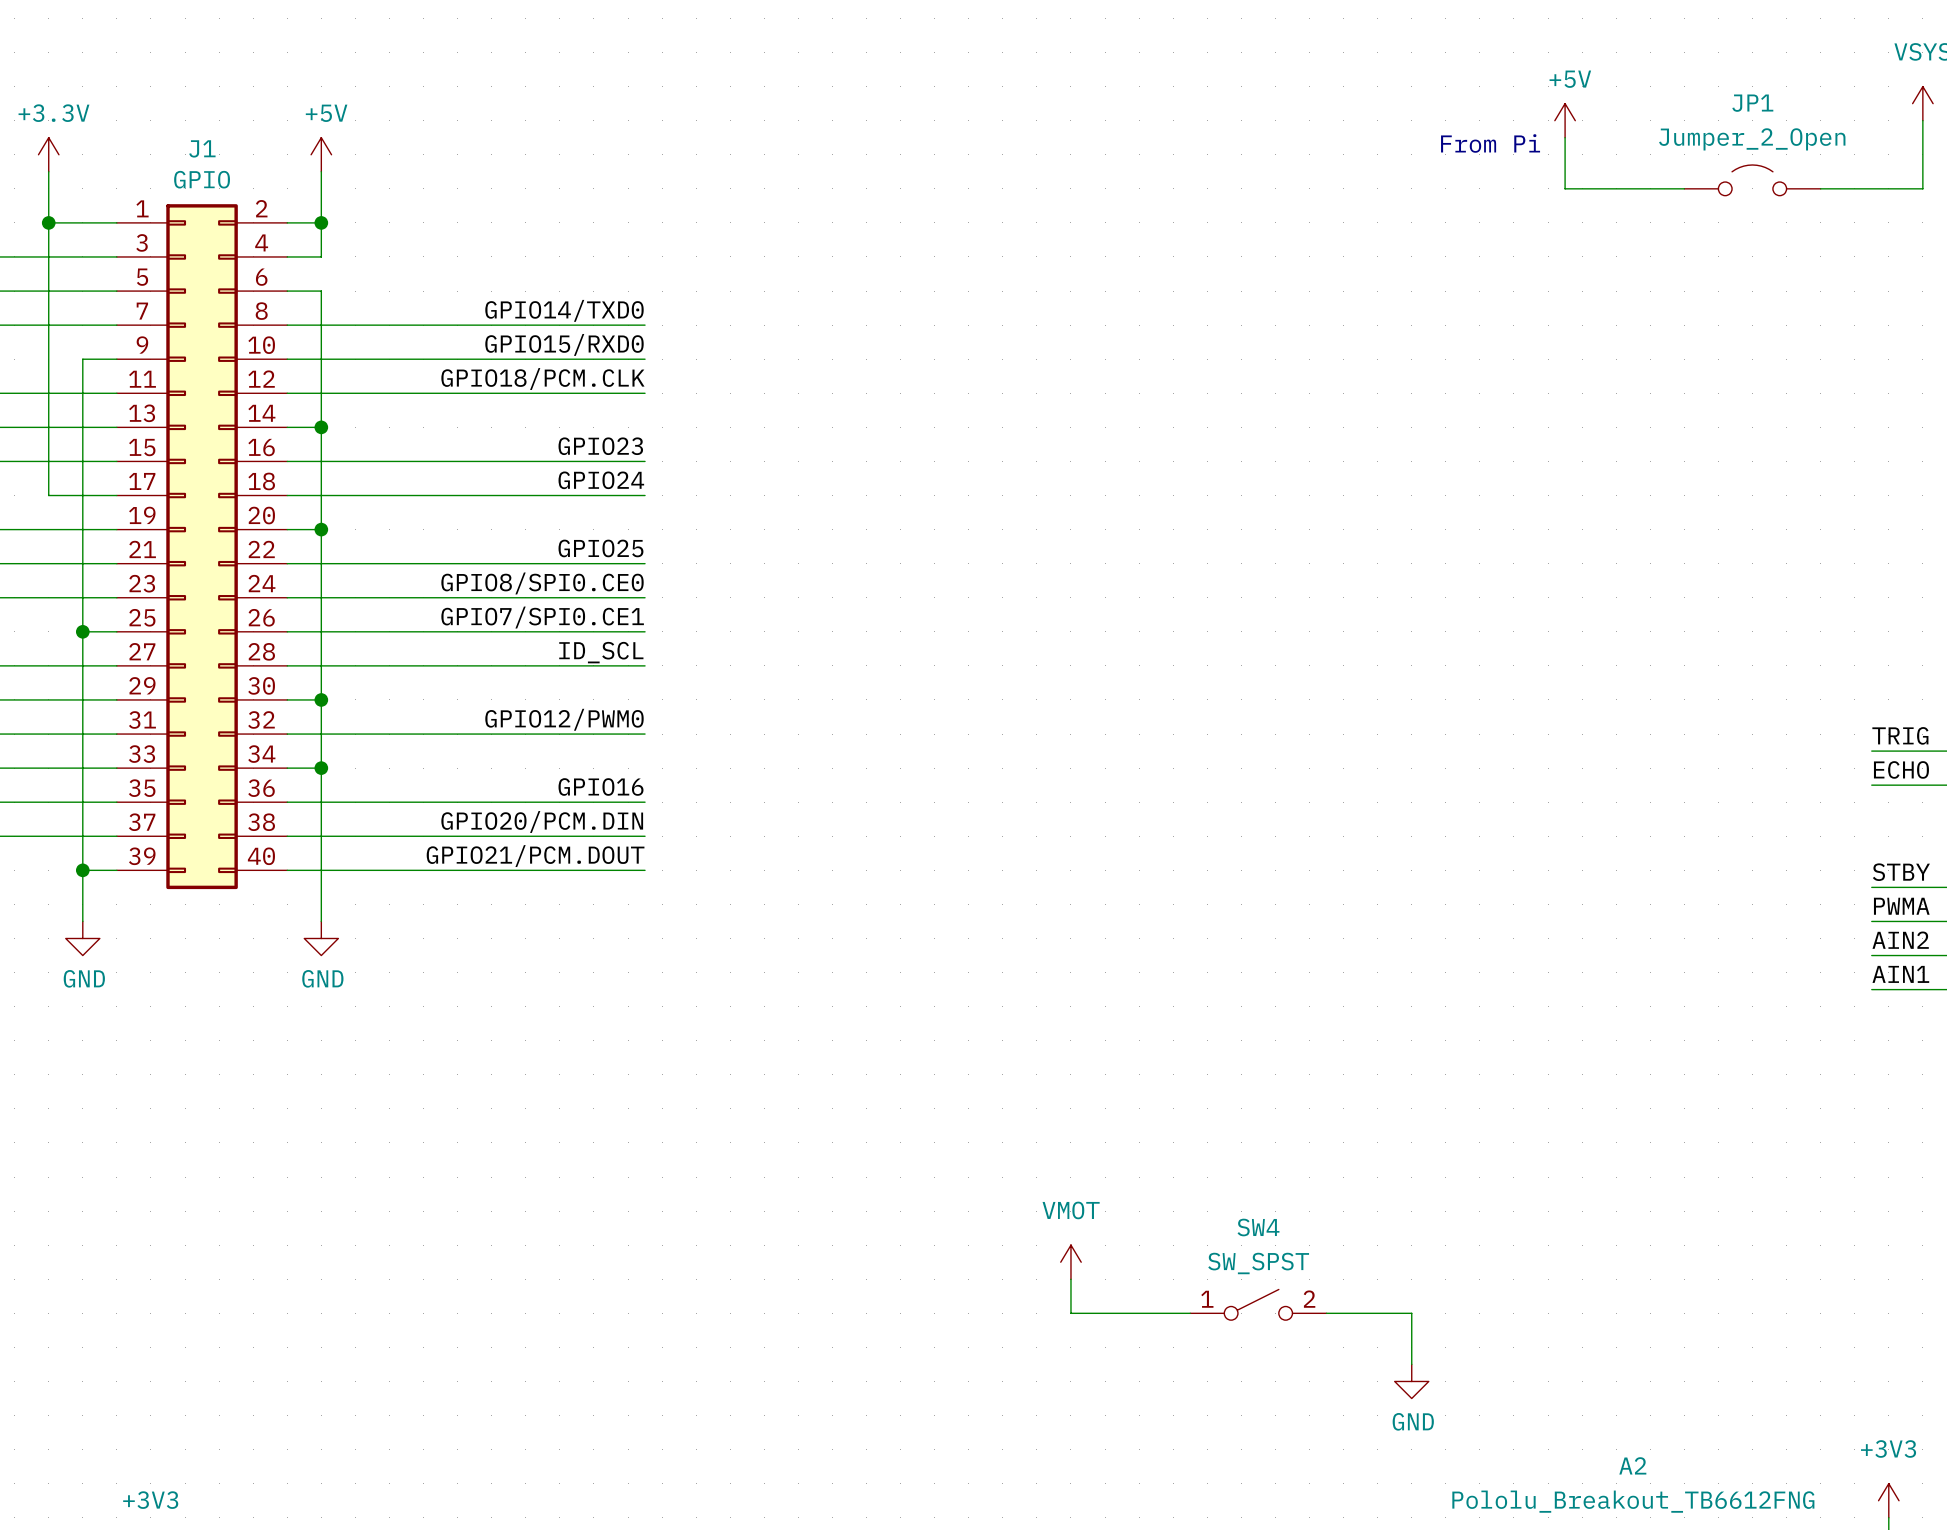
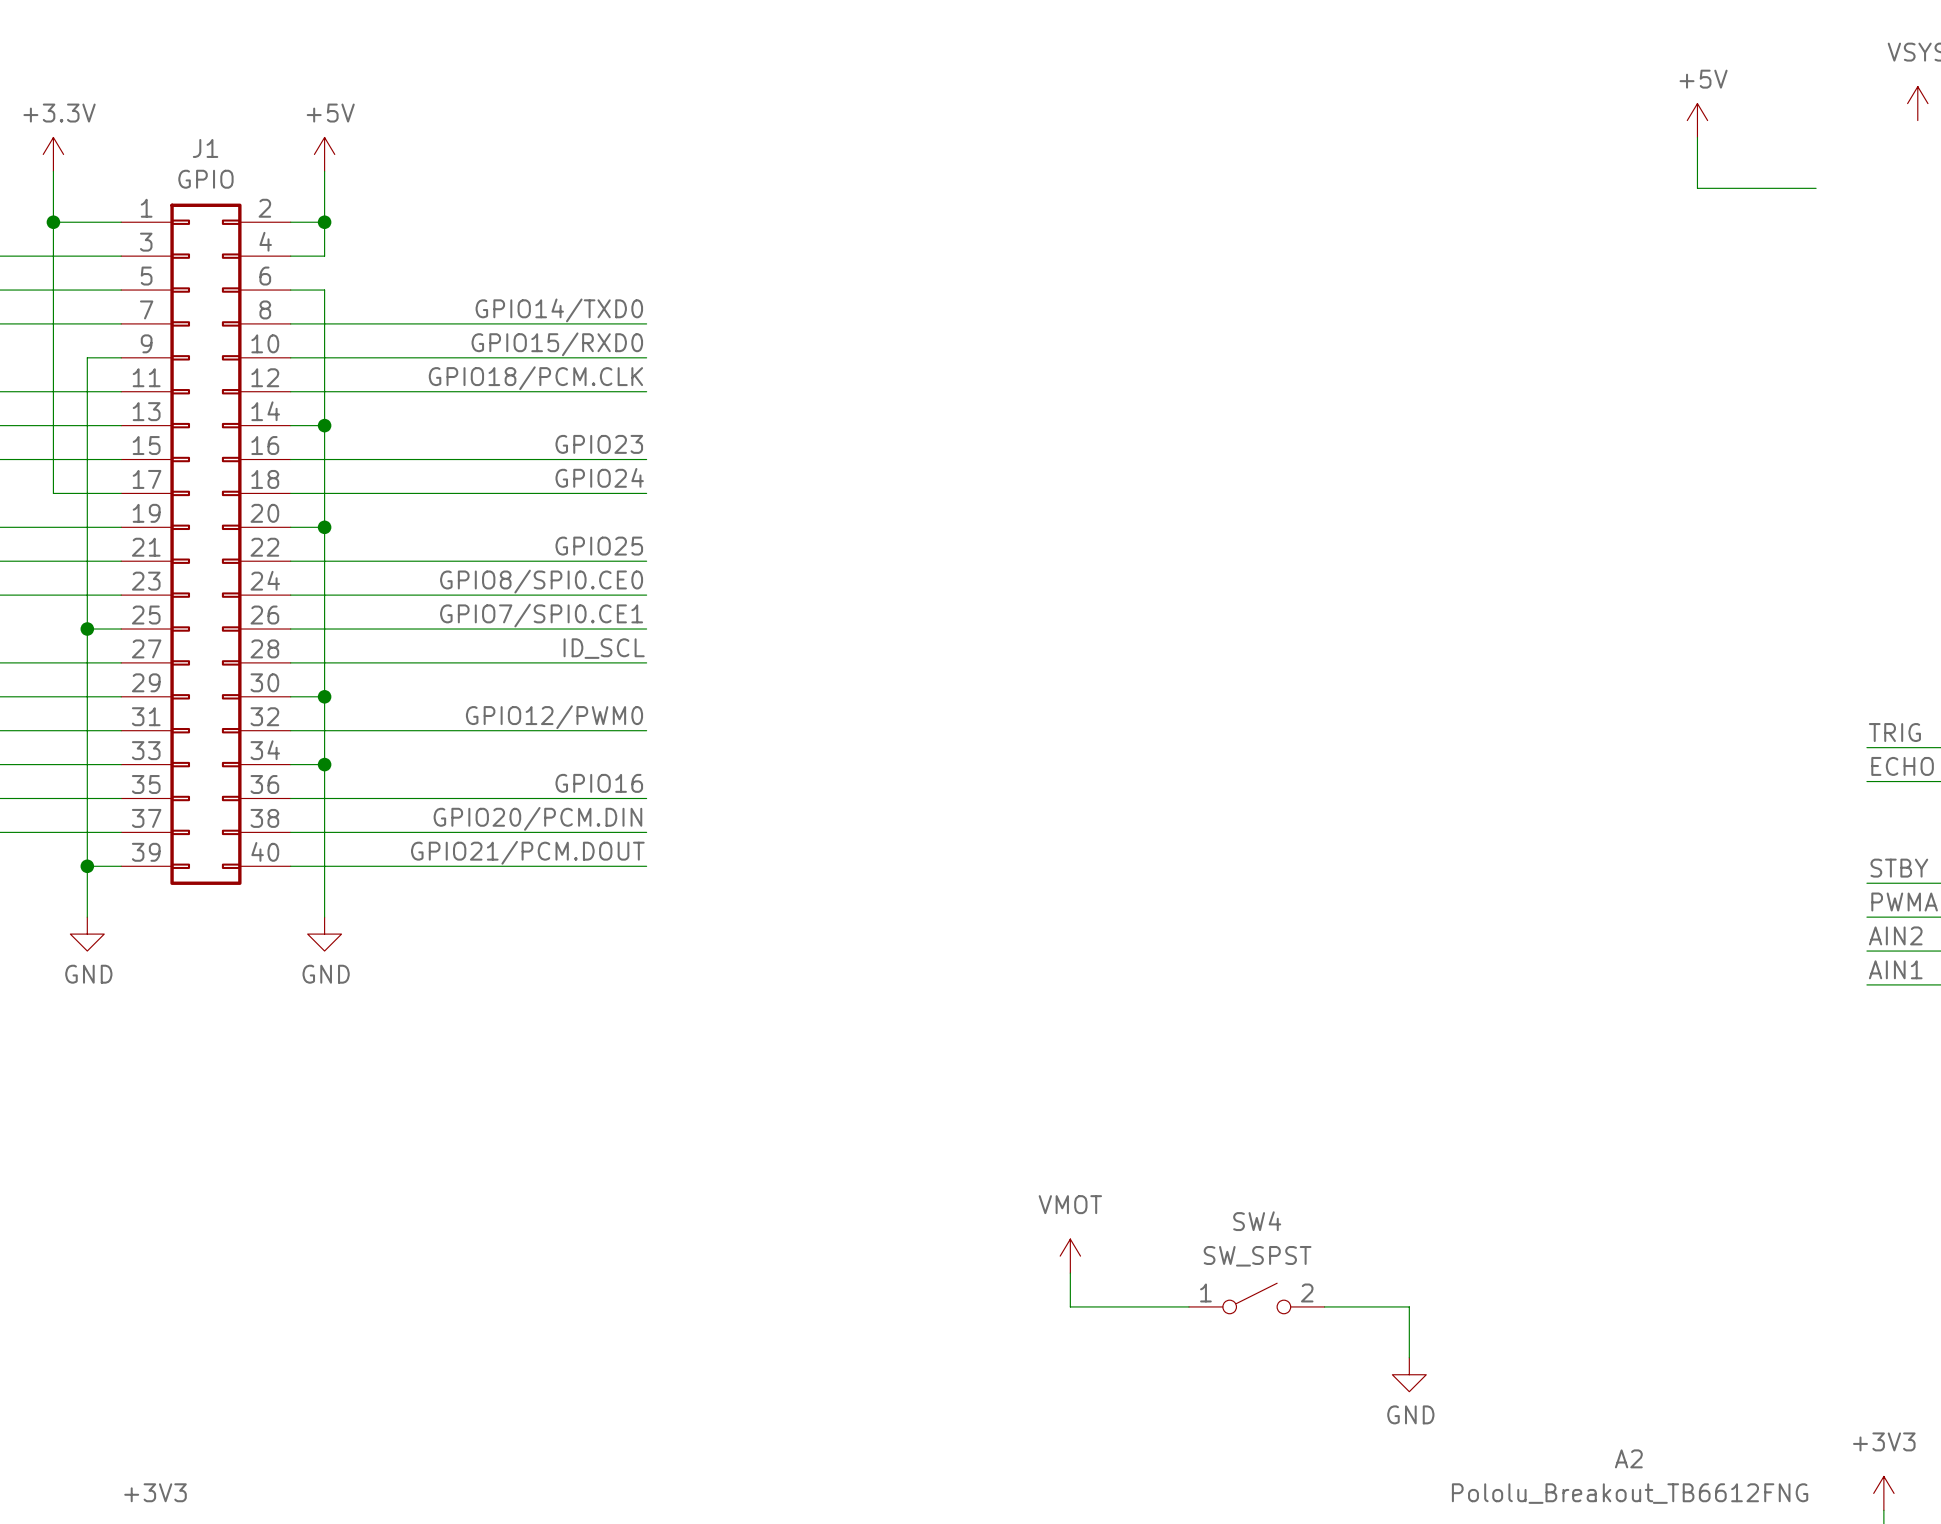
power symbol position: +5V (1565, 120) -> +5V (1697, 120)
wire: (1922, 120) (1922, 188) (1820, 188) -> (1697, 137) (1697, 188) (1816, 188)
wire: (1565, 137) (1565, 188) (1684, 188) -> none
text: From Pi (1490, 143) -> none
JP1: Jumper_2_Open (1752, 180) -> none

